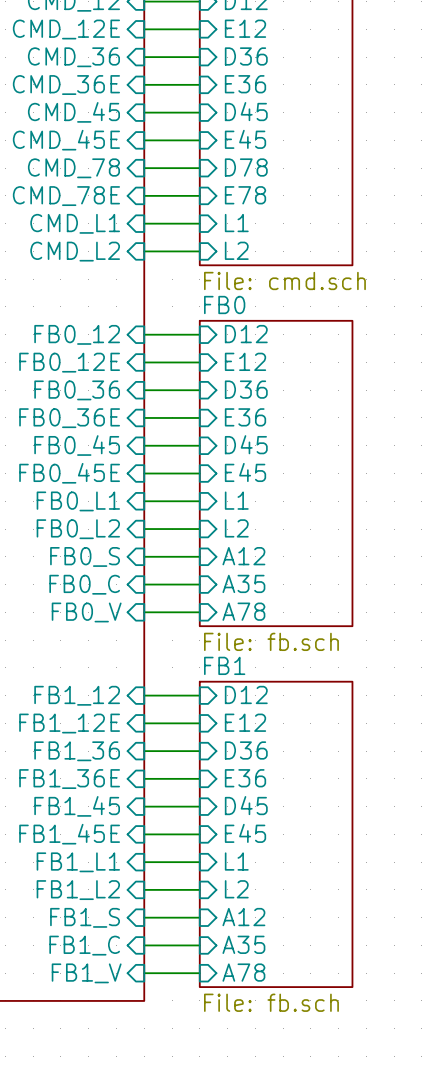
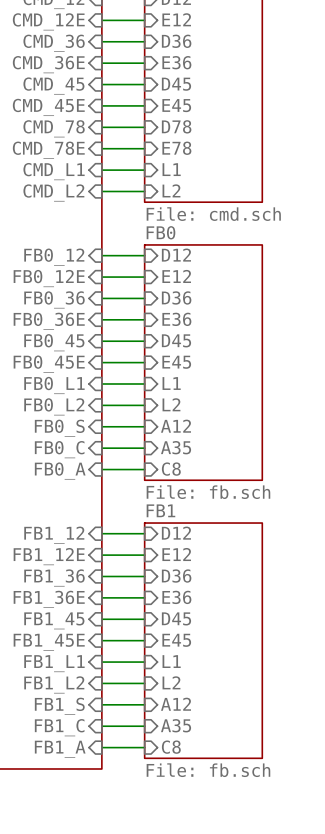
sheet pin: A78 (243, 611) -> C8 (171, 469)
sheet pin: FB0_V (86, 612) -> FB0_A (60, 471)
sheet pin: A78 (243, 972) -> C8 (171, 747)
sheet pin: FB1_V (86, 973) -> FB1_A (60, 749)

